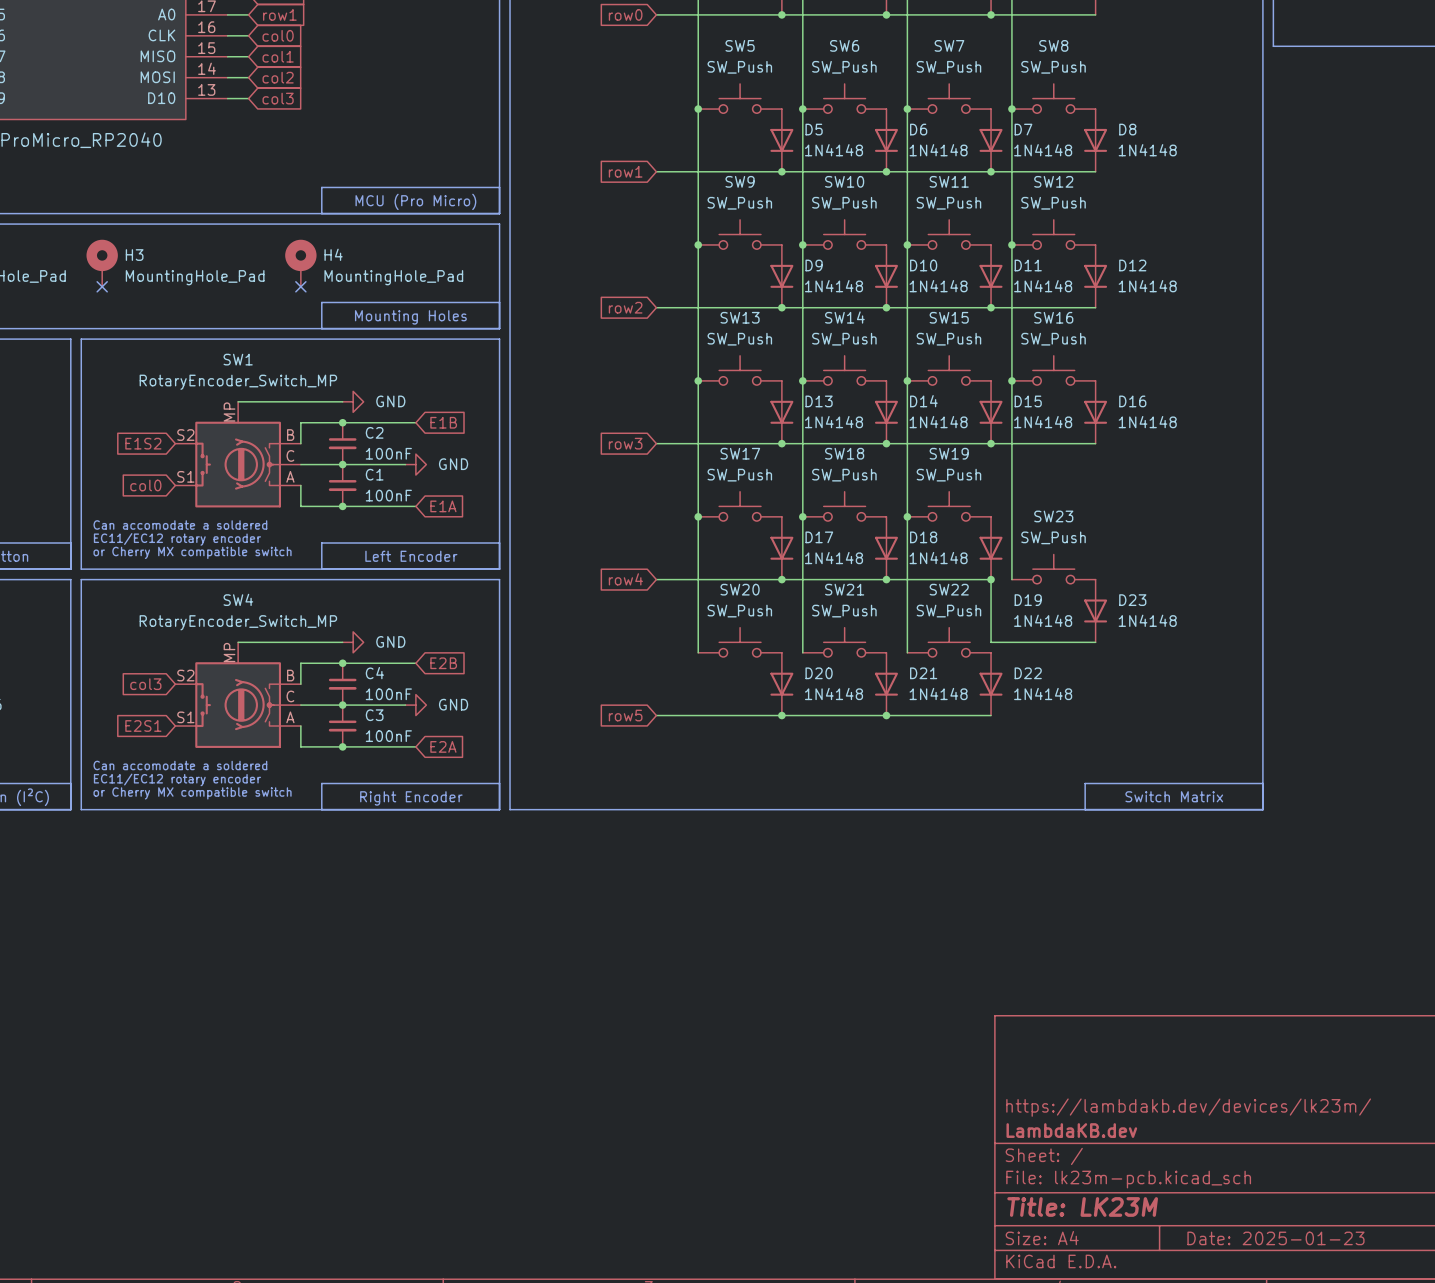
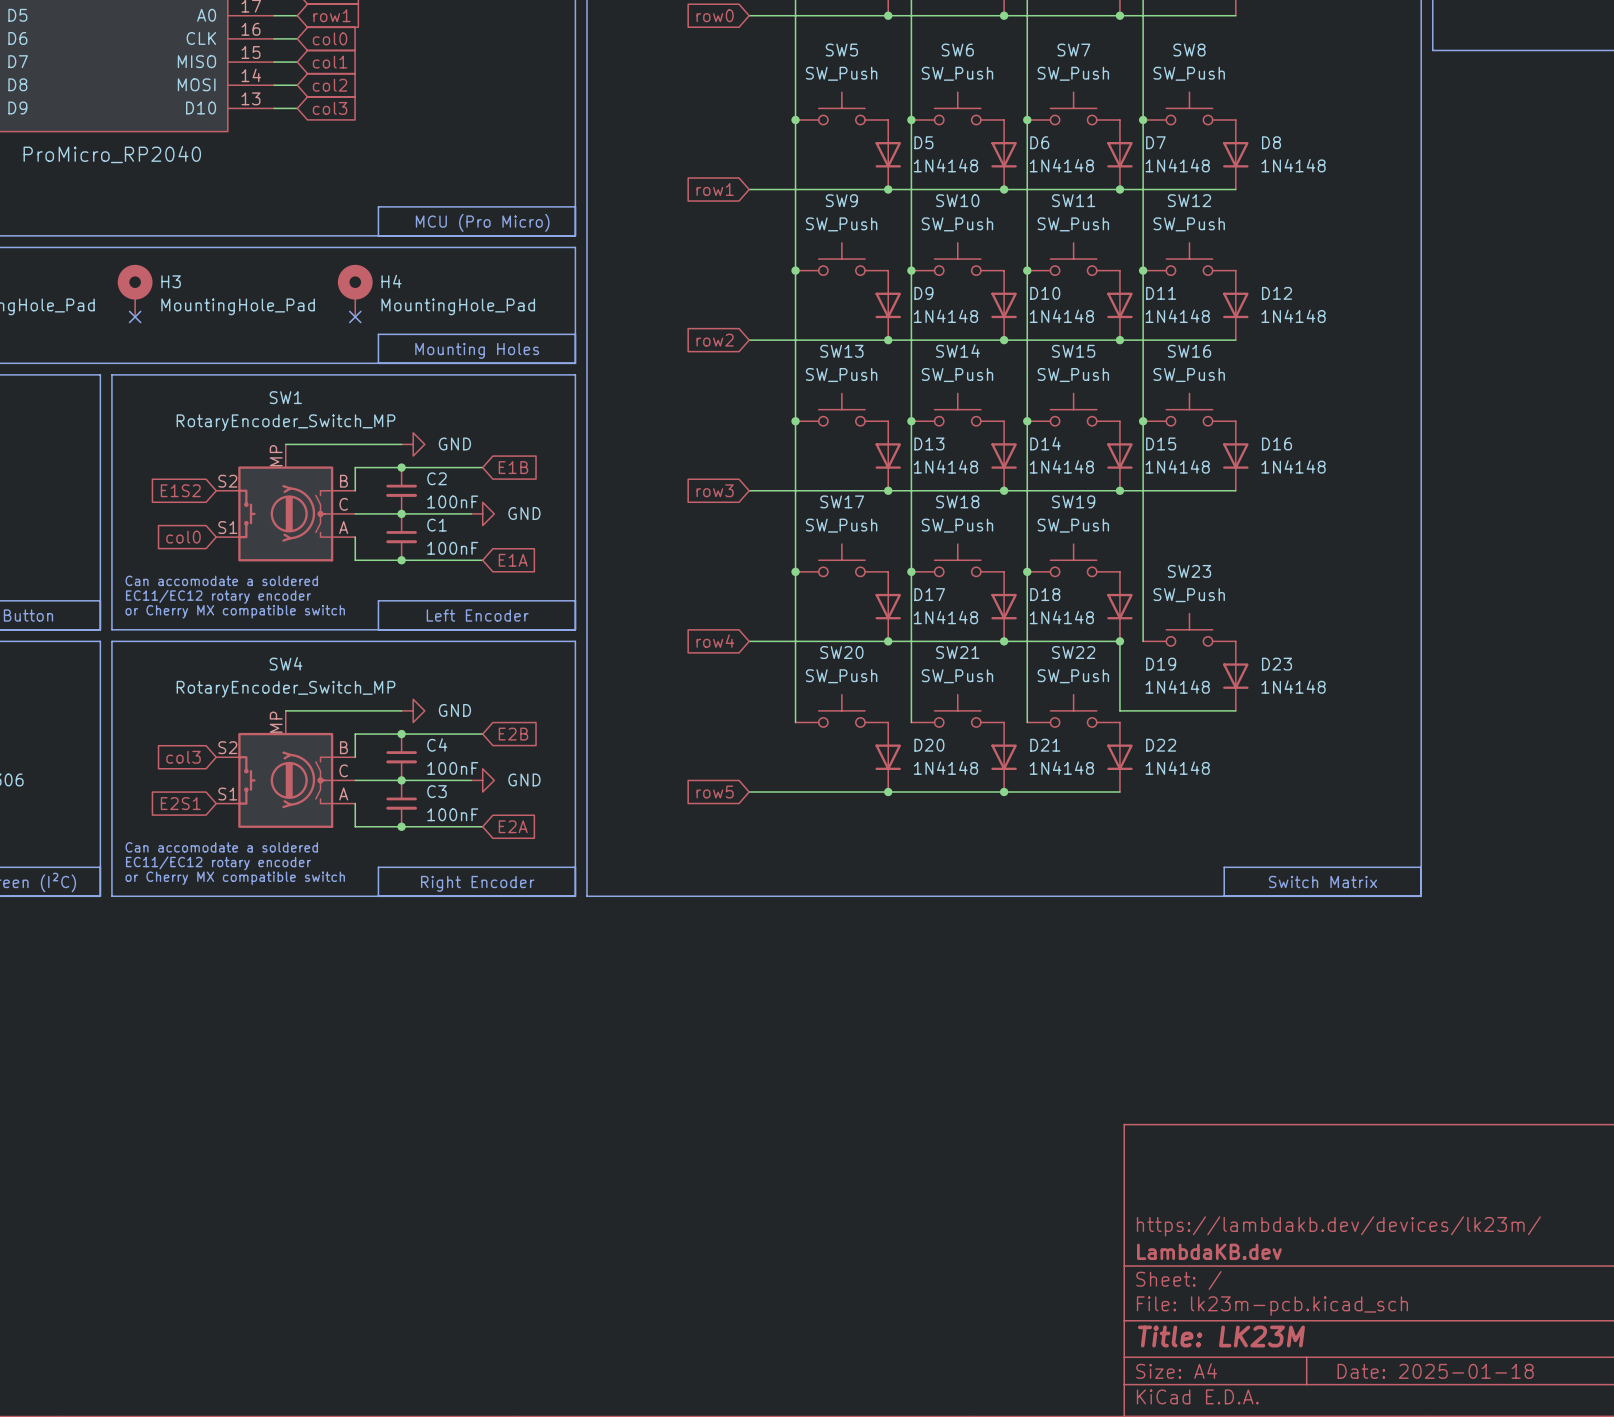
title block: Date: 2025-01-23 (1275, 1238) -> Date: 2025-01-18 (1435, 1371)

